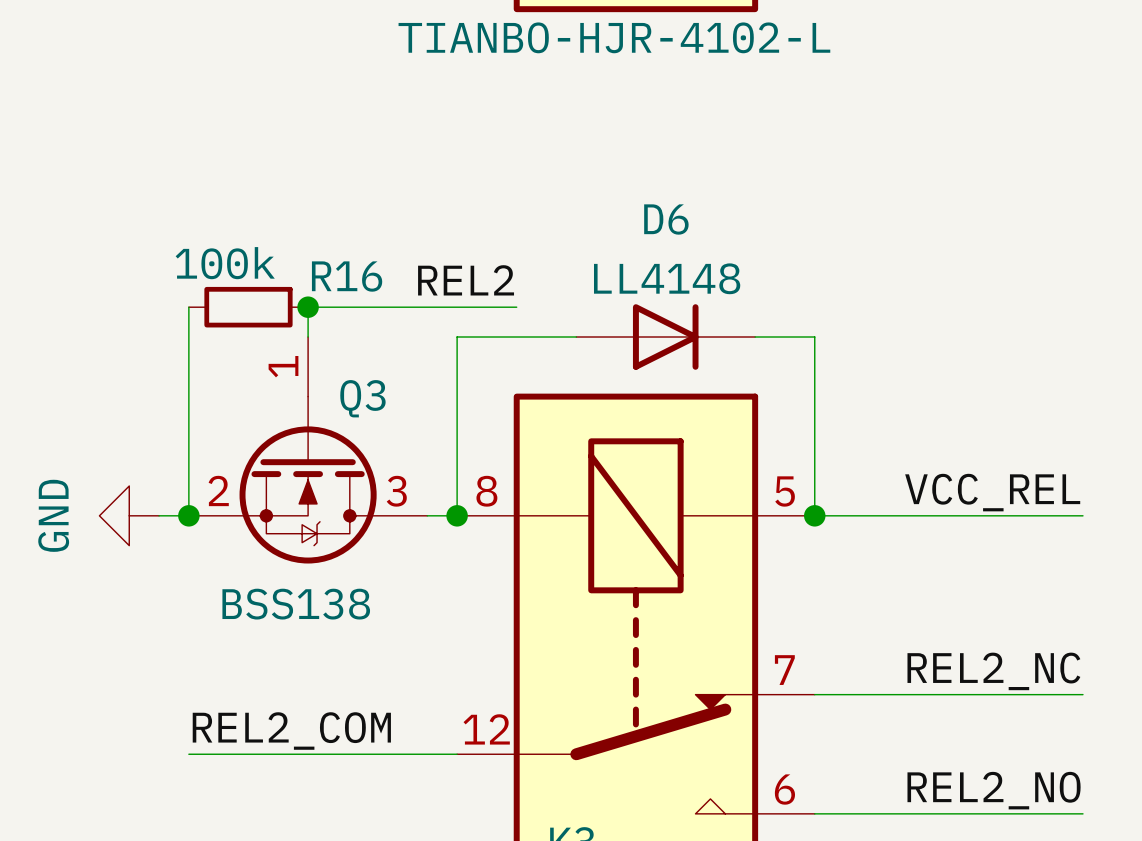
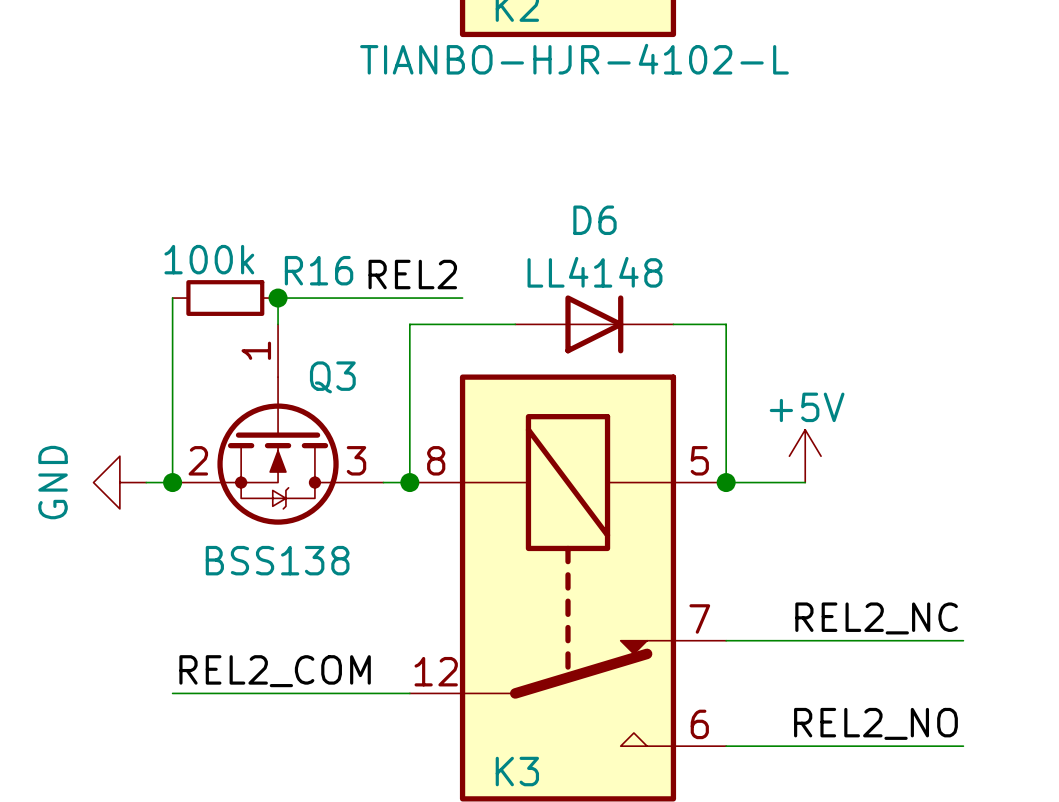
power symbol: none -> +5V (805, 456)
label: VCC_REL (992, 492) -> none
wire: (904, 515) (1082, 515) -> none

